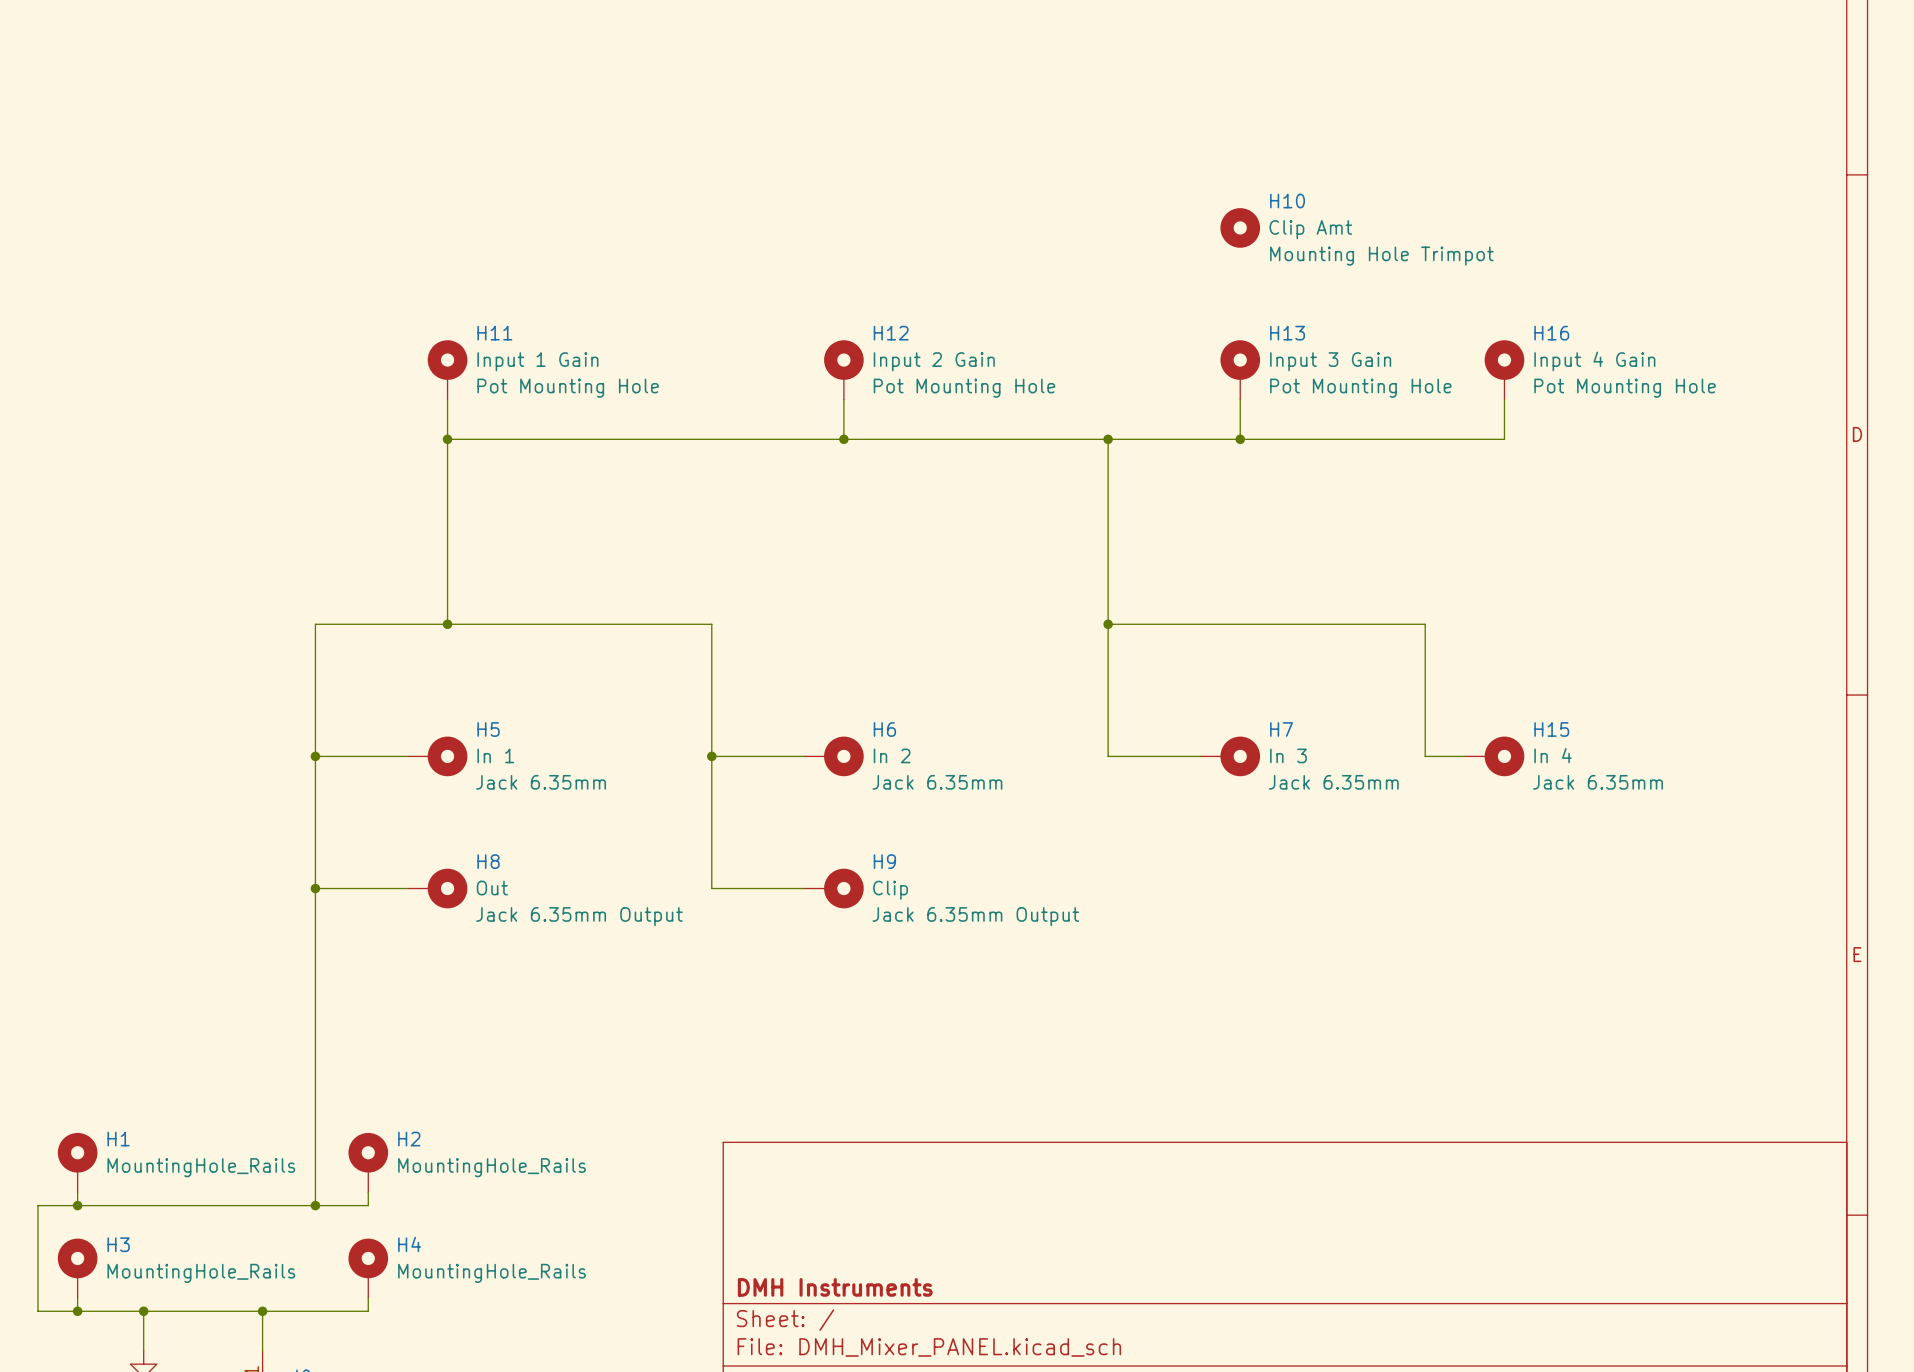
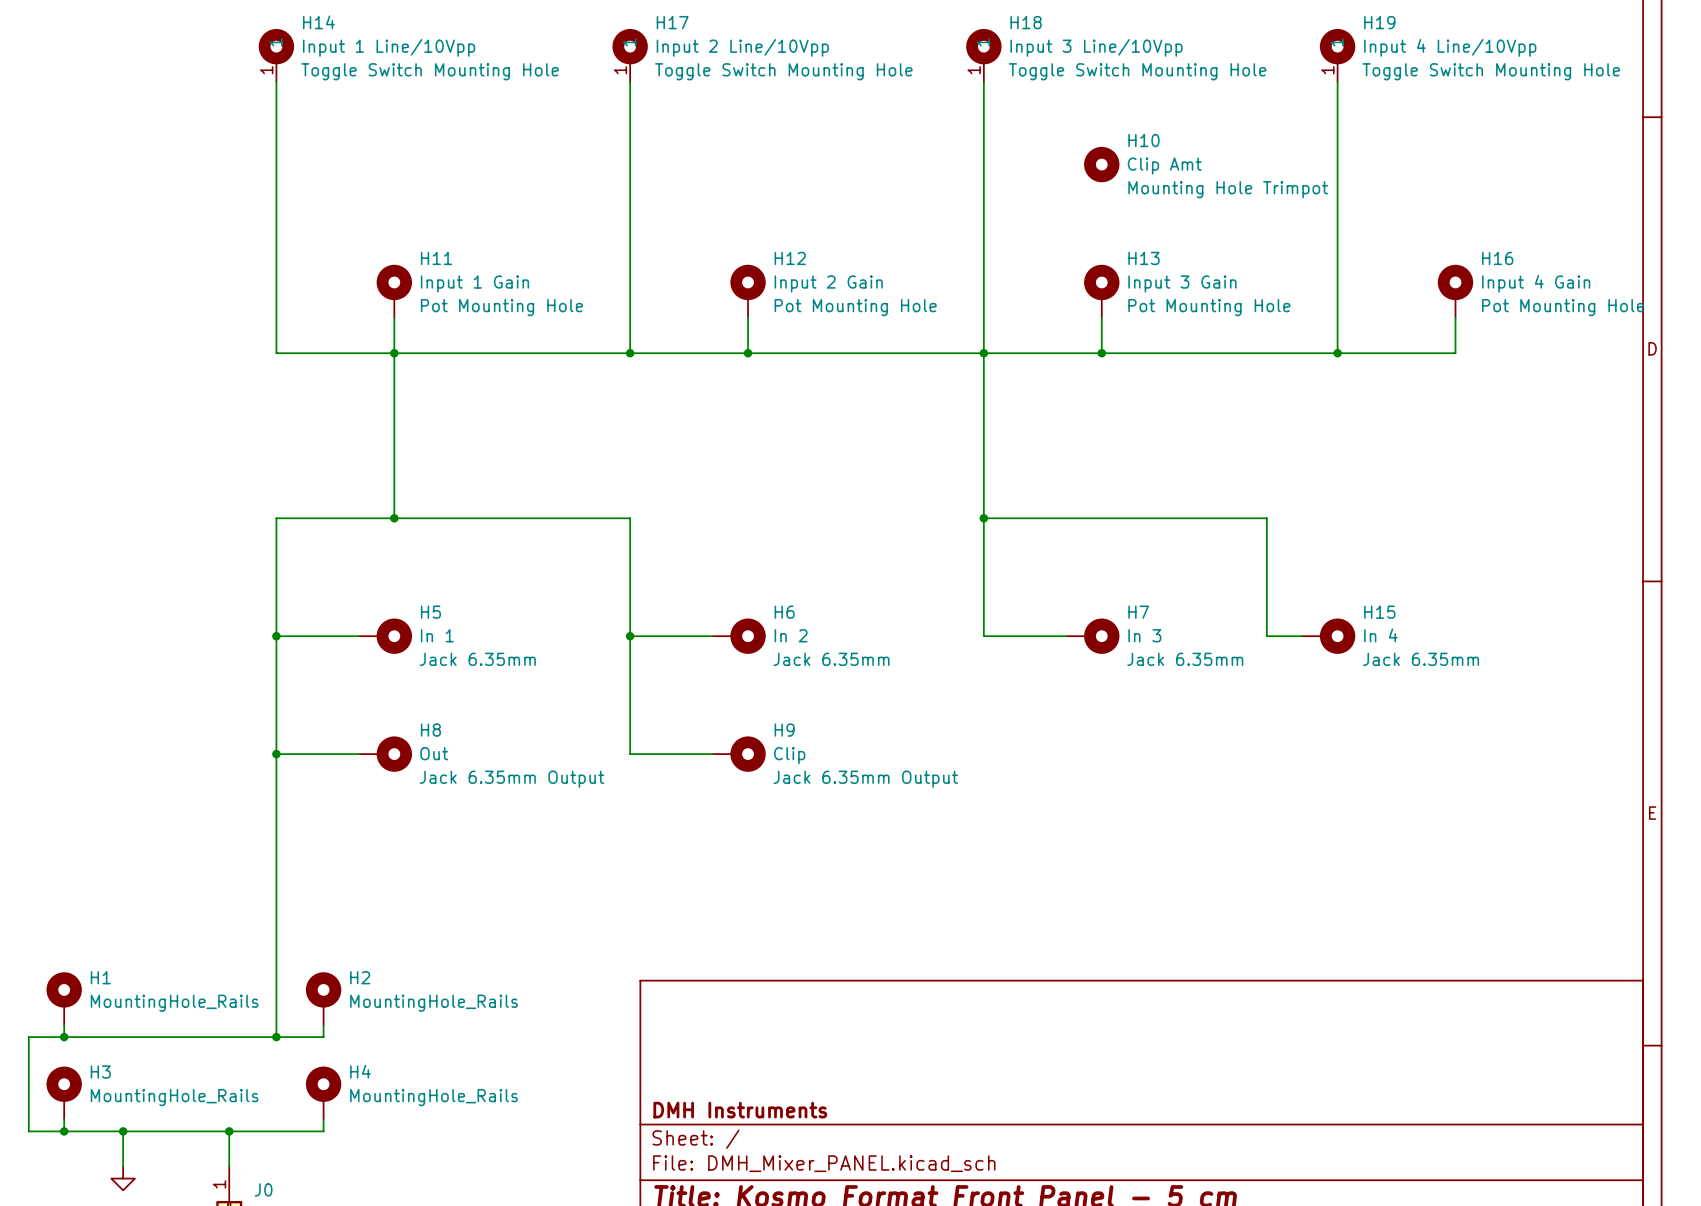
H14: none -> Input 1 Line/10Vpp (276, 55)
H17: none -> Input 2 Line/10Vpp (630, 55)
H18: none -> Input 3 Line/10Vpp (983, 55)
H19: none -> Input 4 Line/10Vpp (1337, 55)
wire: none -> (276, 82) (276, 353) (394, 353)
wire: none -> (630, 82) (630, 353)
wire: none -> (983, 82) (983, 353)
wire: none -> (1337, 82) (1337, 317)
H16 position: (1504, 369) -> (1455, 291)
wire: none -> (1455, 317) (1455, 353) (1337, 353)
junction: none -> (630, 353)
junction: none -> (1337, 353)

